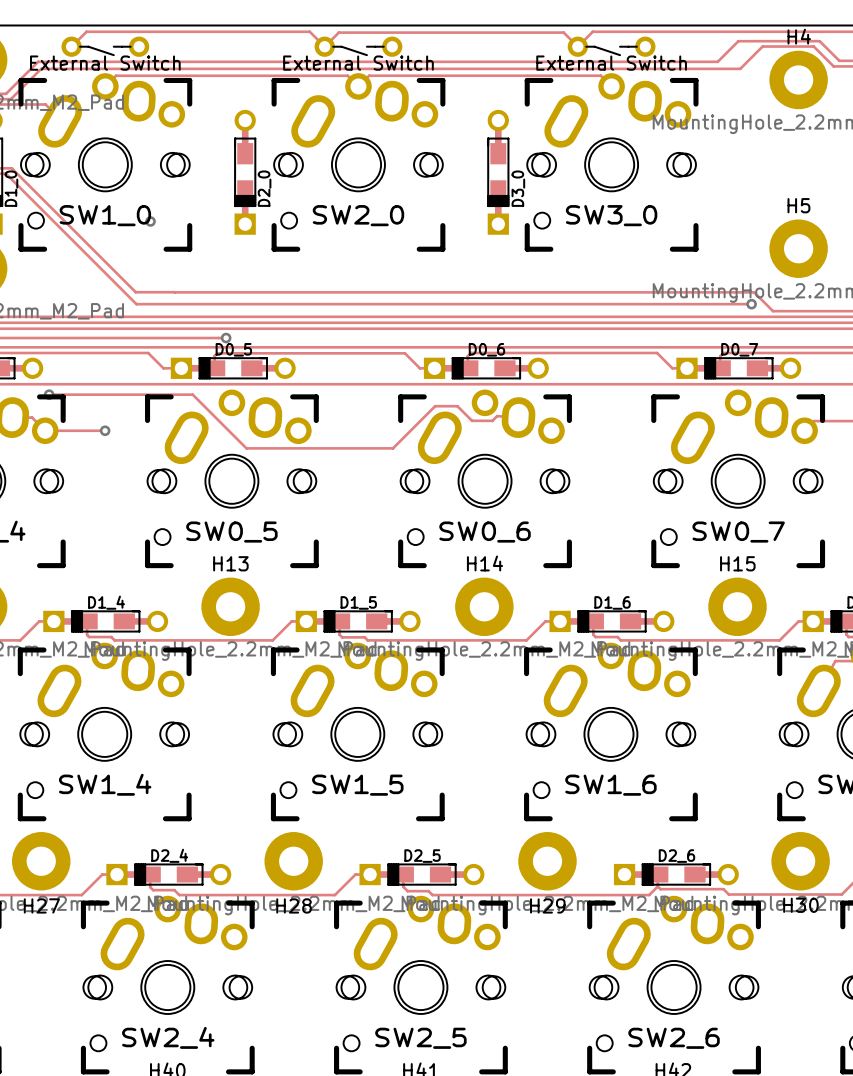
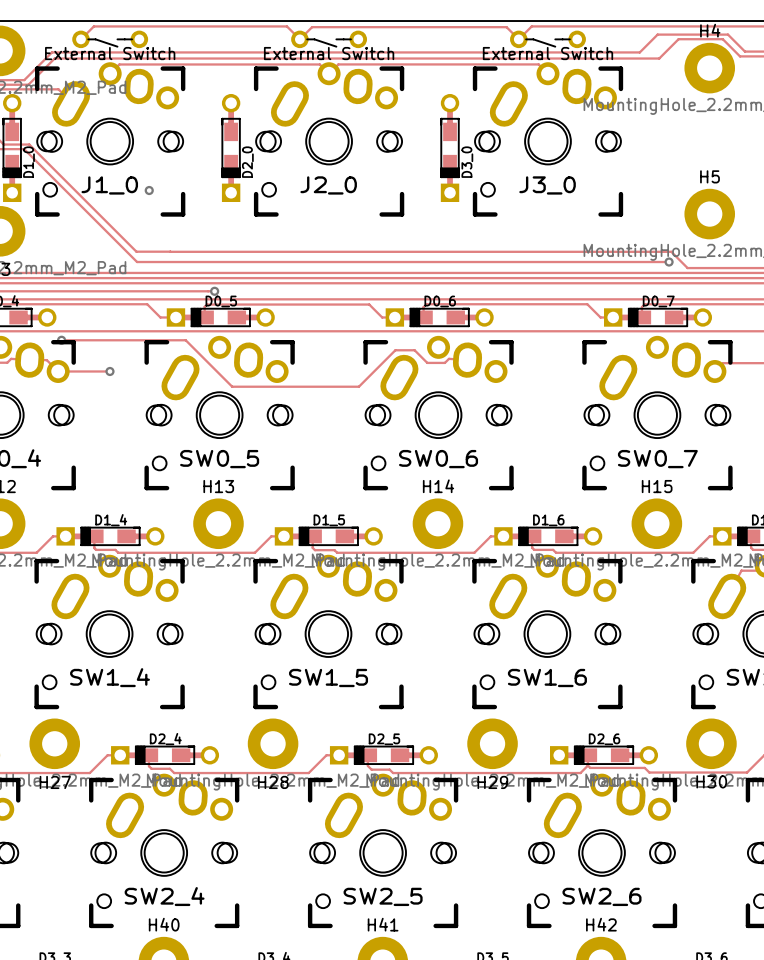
SW1_0 name: SW1_0 (105, 215) -> J1_0 (109, 185)
SW2_0 name: SW2_0 (358, 215) -> J2_0 (328, 185)
SW3_0 name: SW3_0 (611, 215) -> J3_0 (547, 185)

